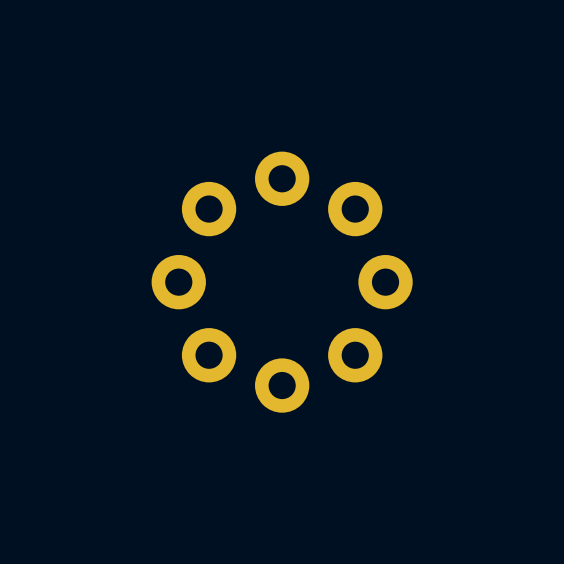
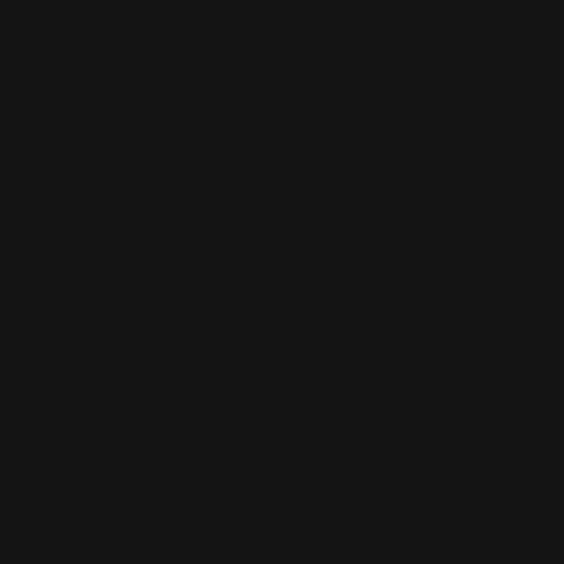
part: (282, 282) -> none

